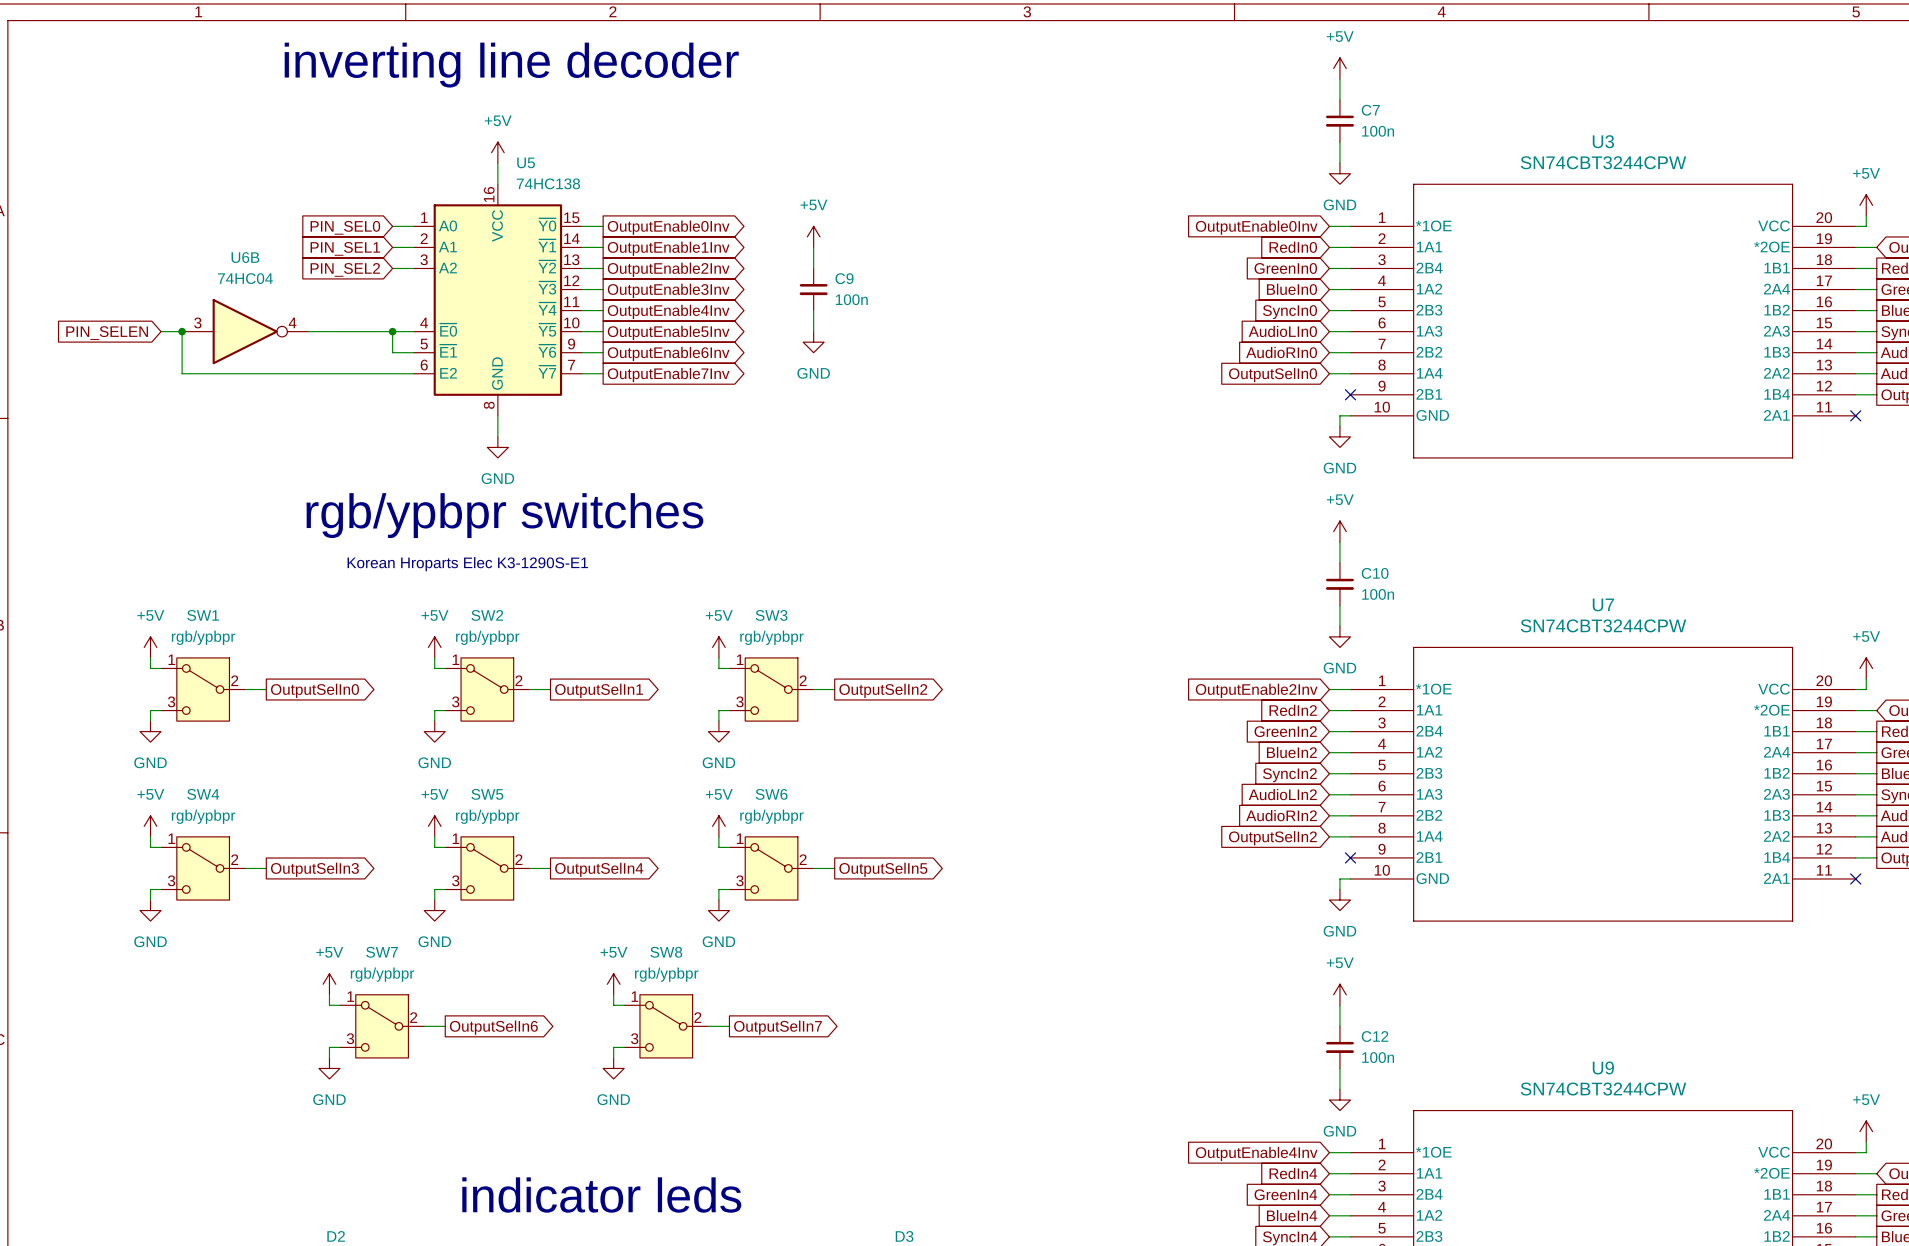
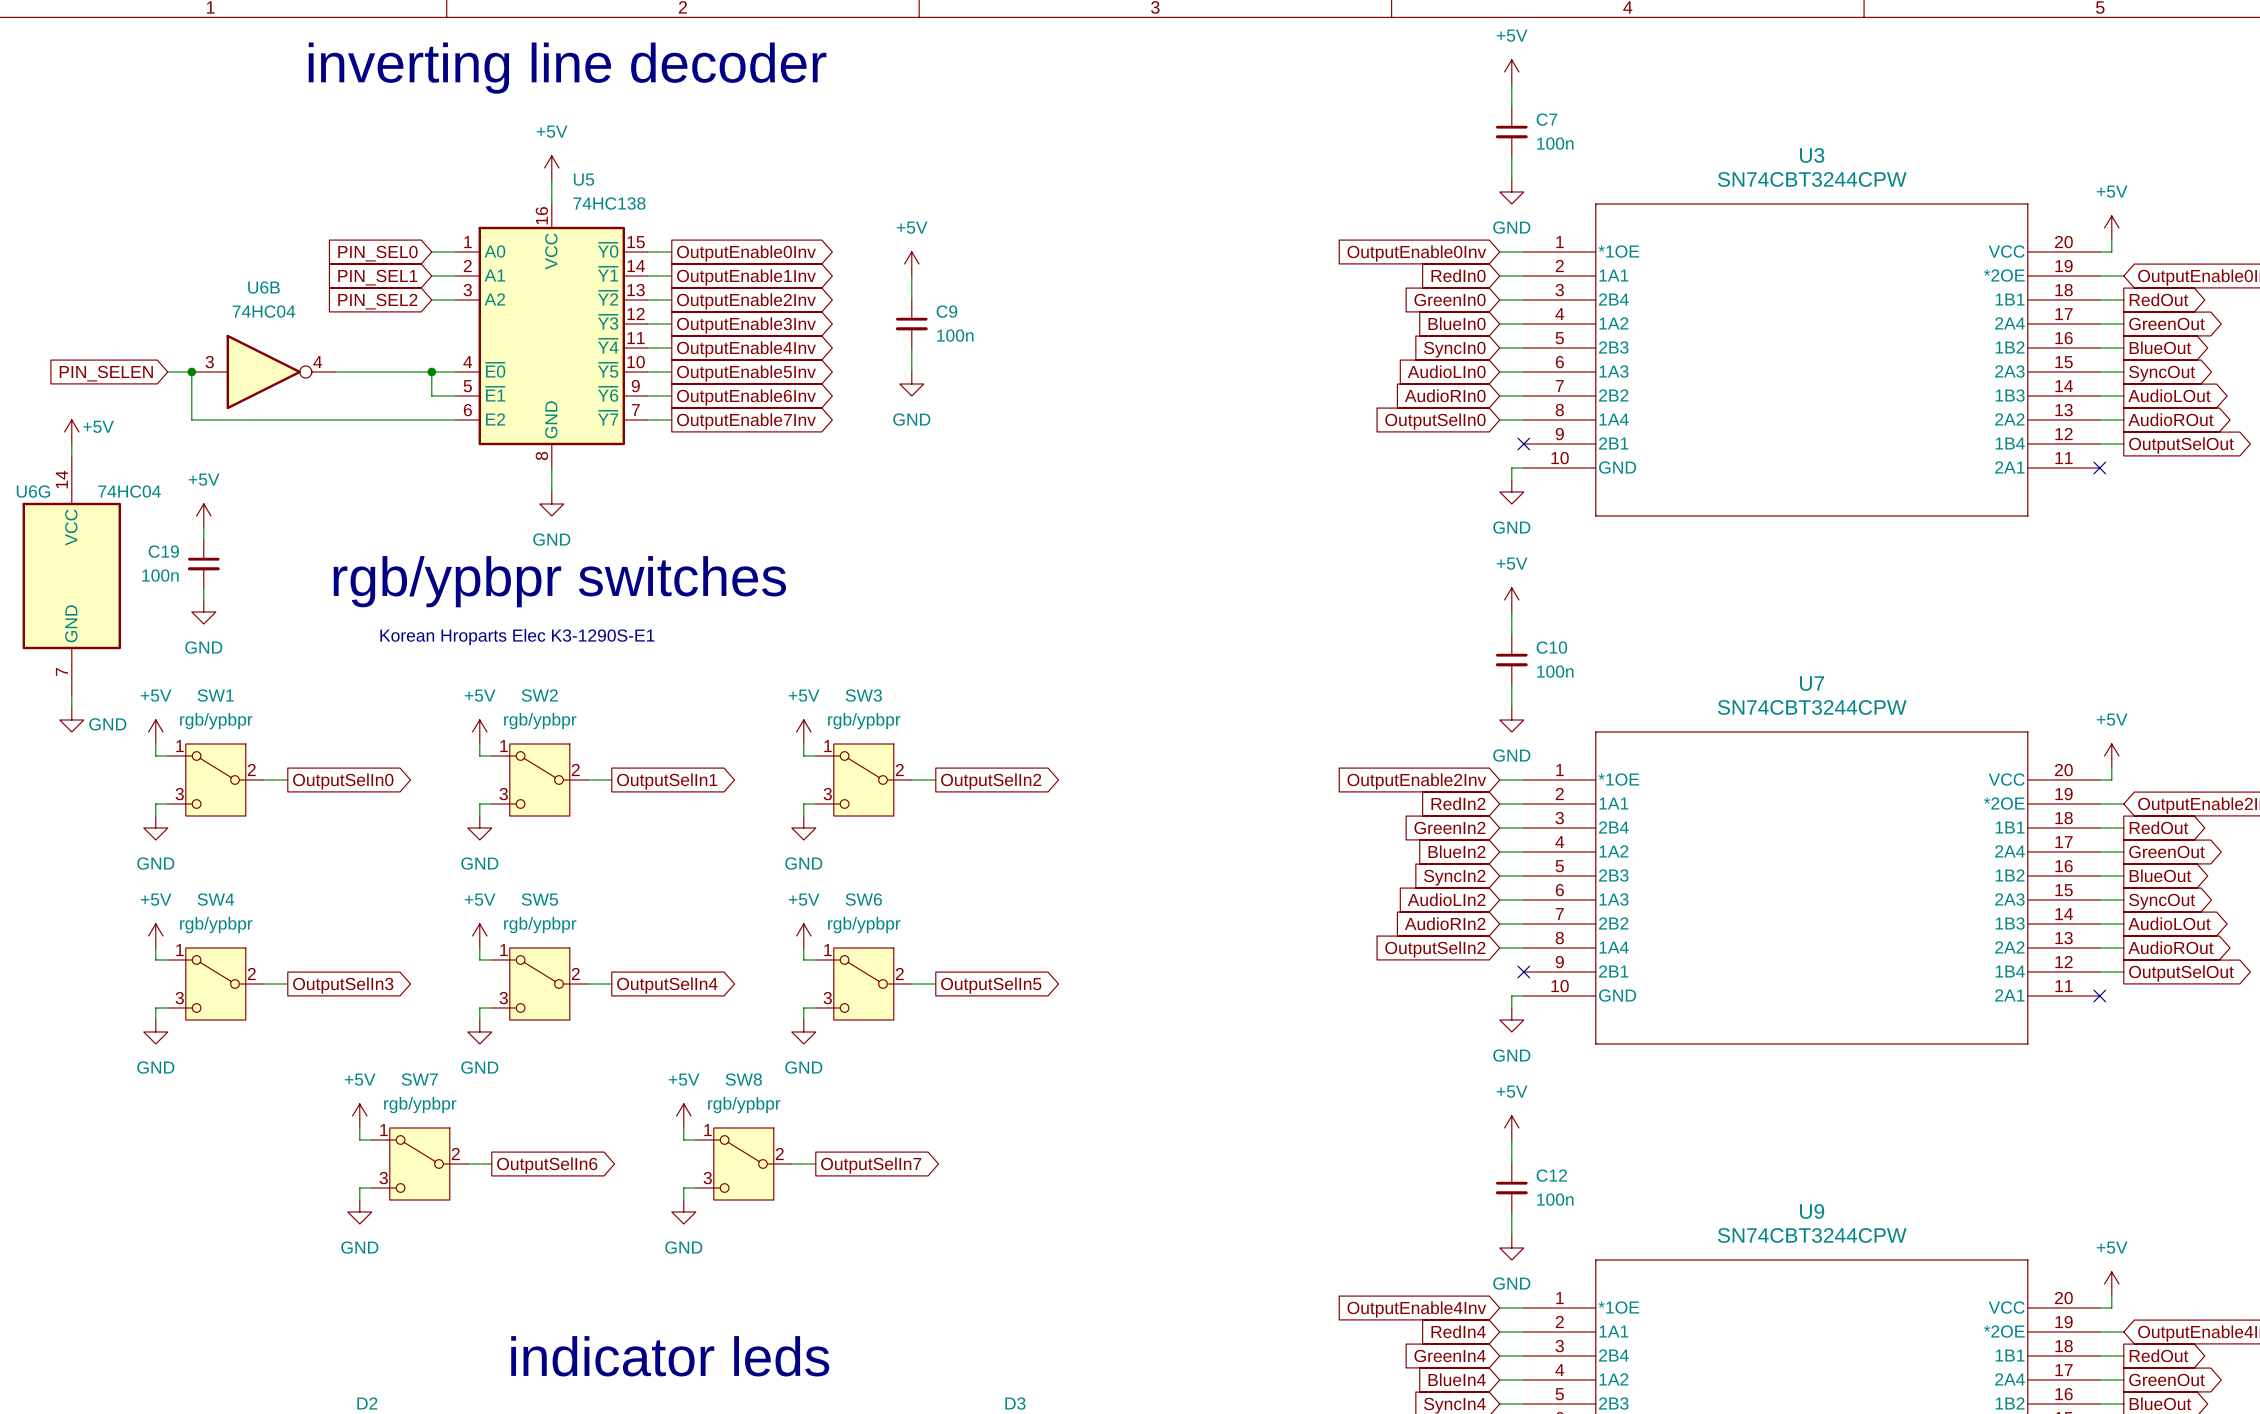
power symbol: none -> +5V (71, 431)
wire: none -> (71, 443) (71, 455)
power symbol: none -> +5V (203, 515)
wire: none -> (203, 527) (203, 539)
C19: none -> 100n (203, 563)
U6G: none -> 74HC04 (71, 575)
wire: none -> (203, 587) (203, 599)
power symbol: none -> GND (203, 611)
wire: none -> (71, 695) (71, 707)
power symbol: none -> GND (71, 719)

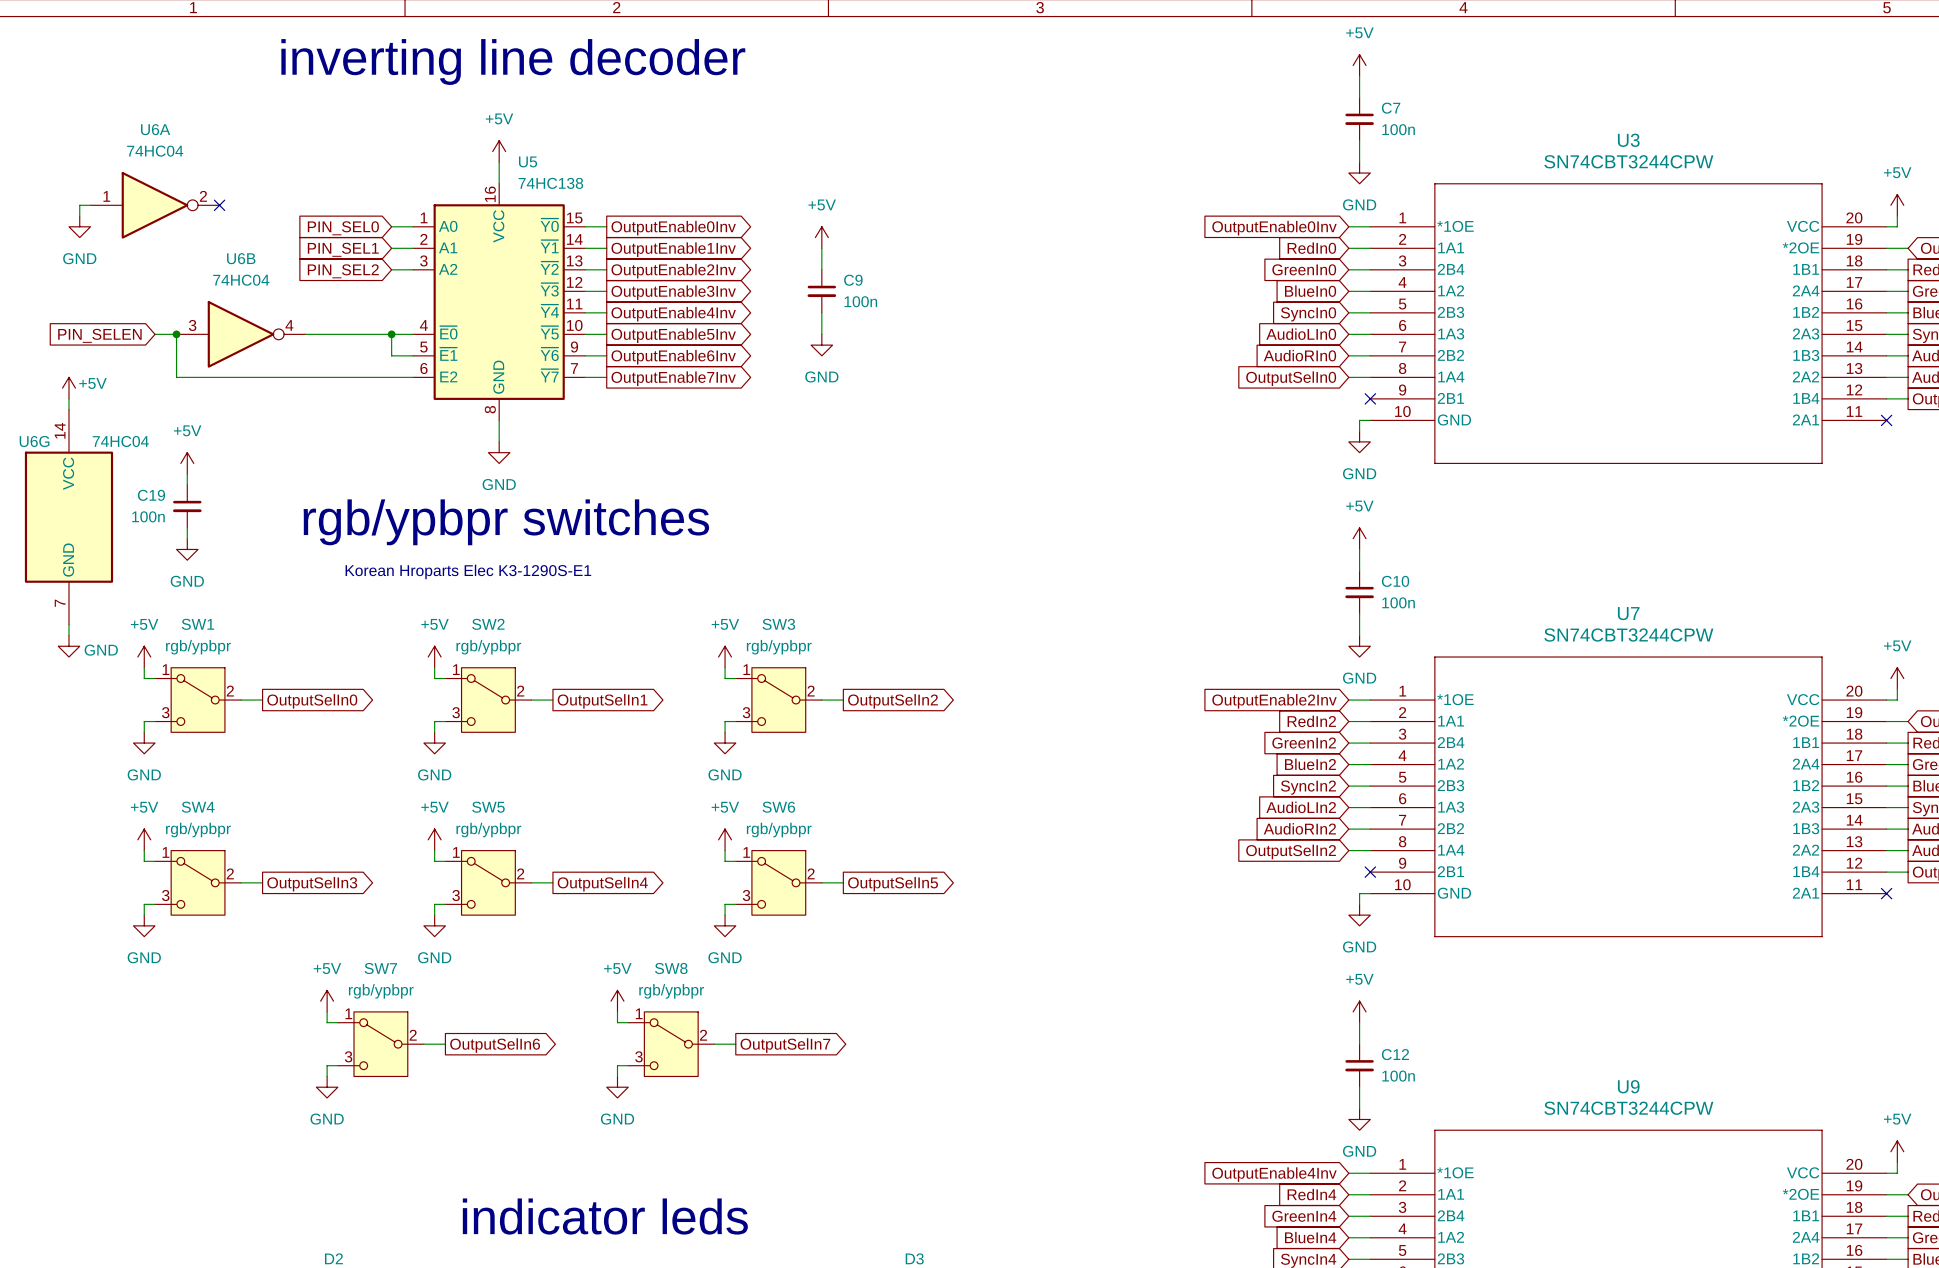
wire: none -> (90, 205) (79, 205) (79, 216)
U6A: none -> 74HC04 (155, 205)
no-connect mark: none -> (219, 205)
power symbol: none -> GND (79, 226)

